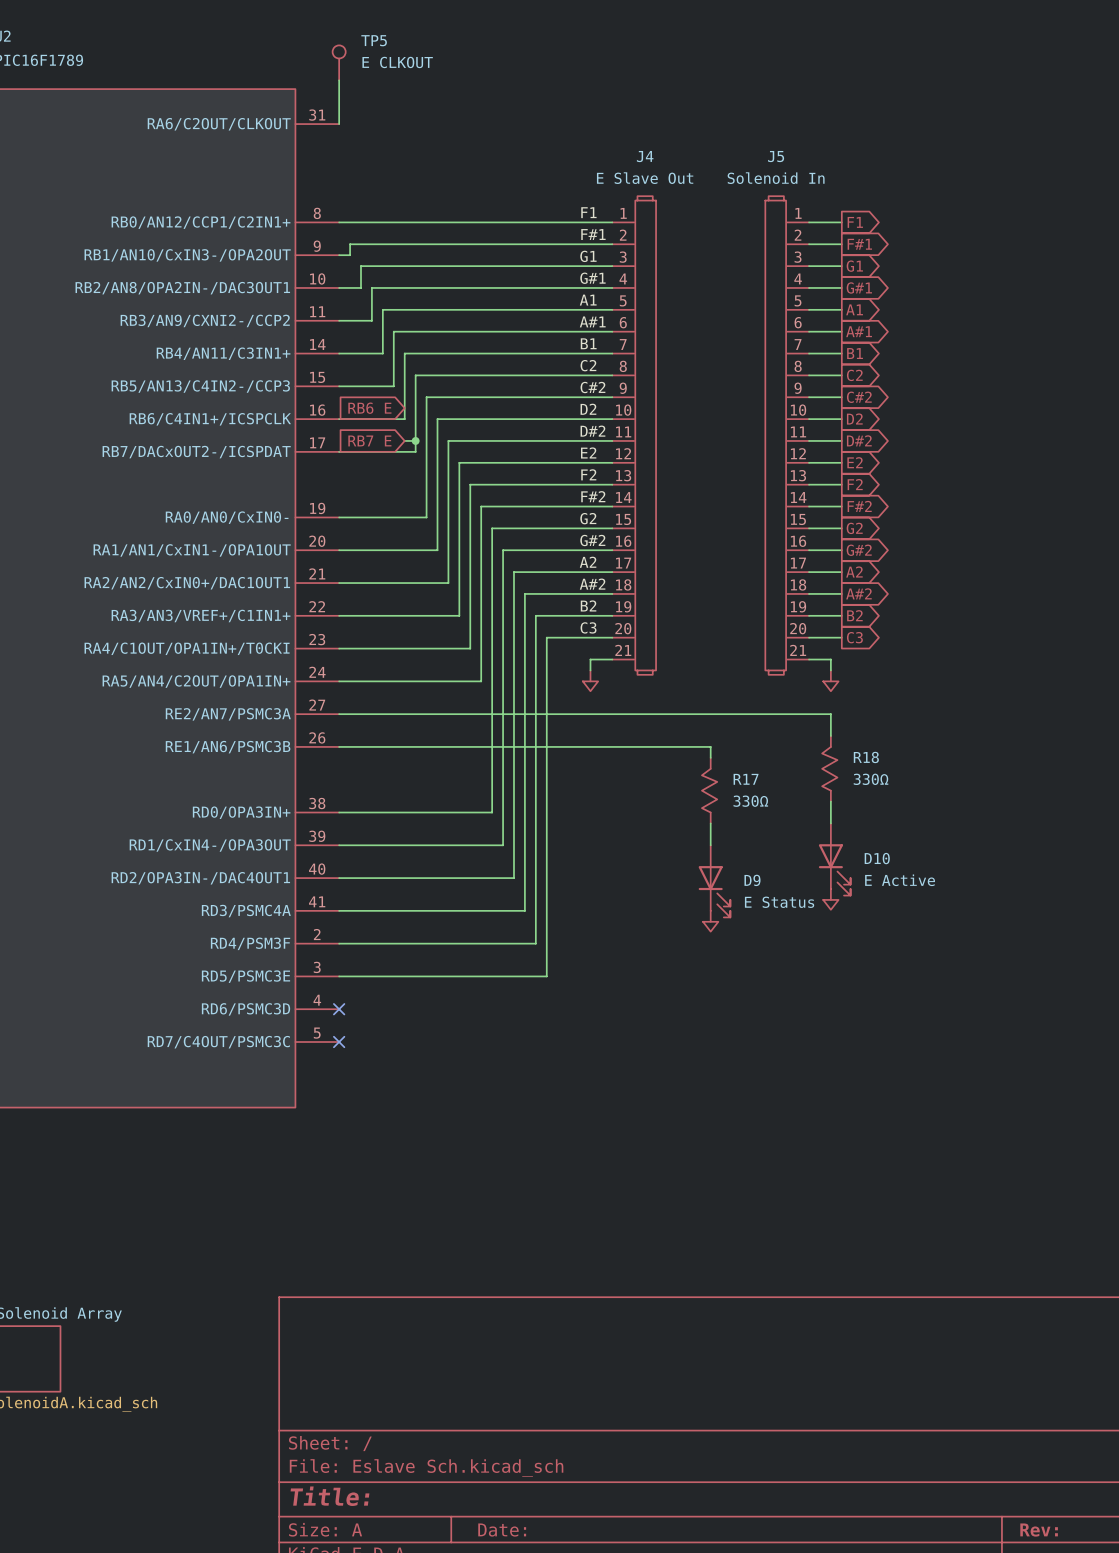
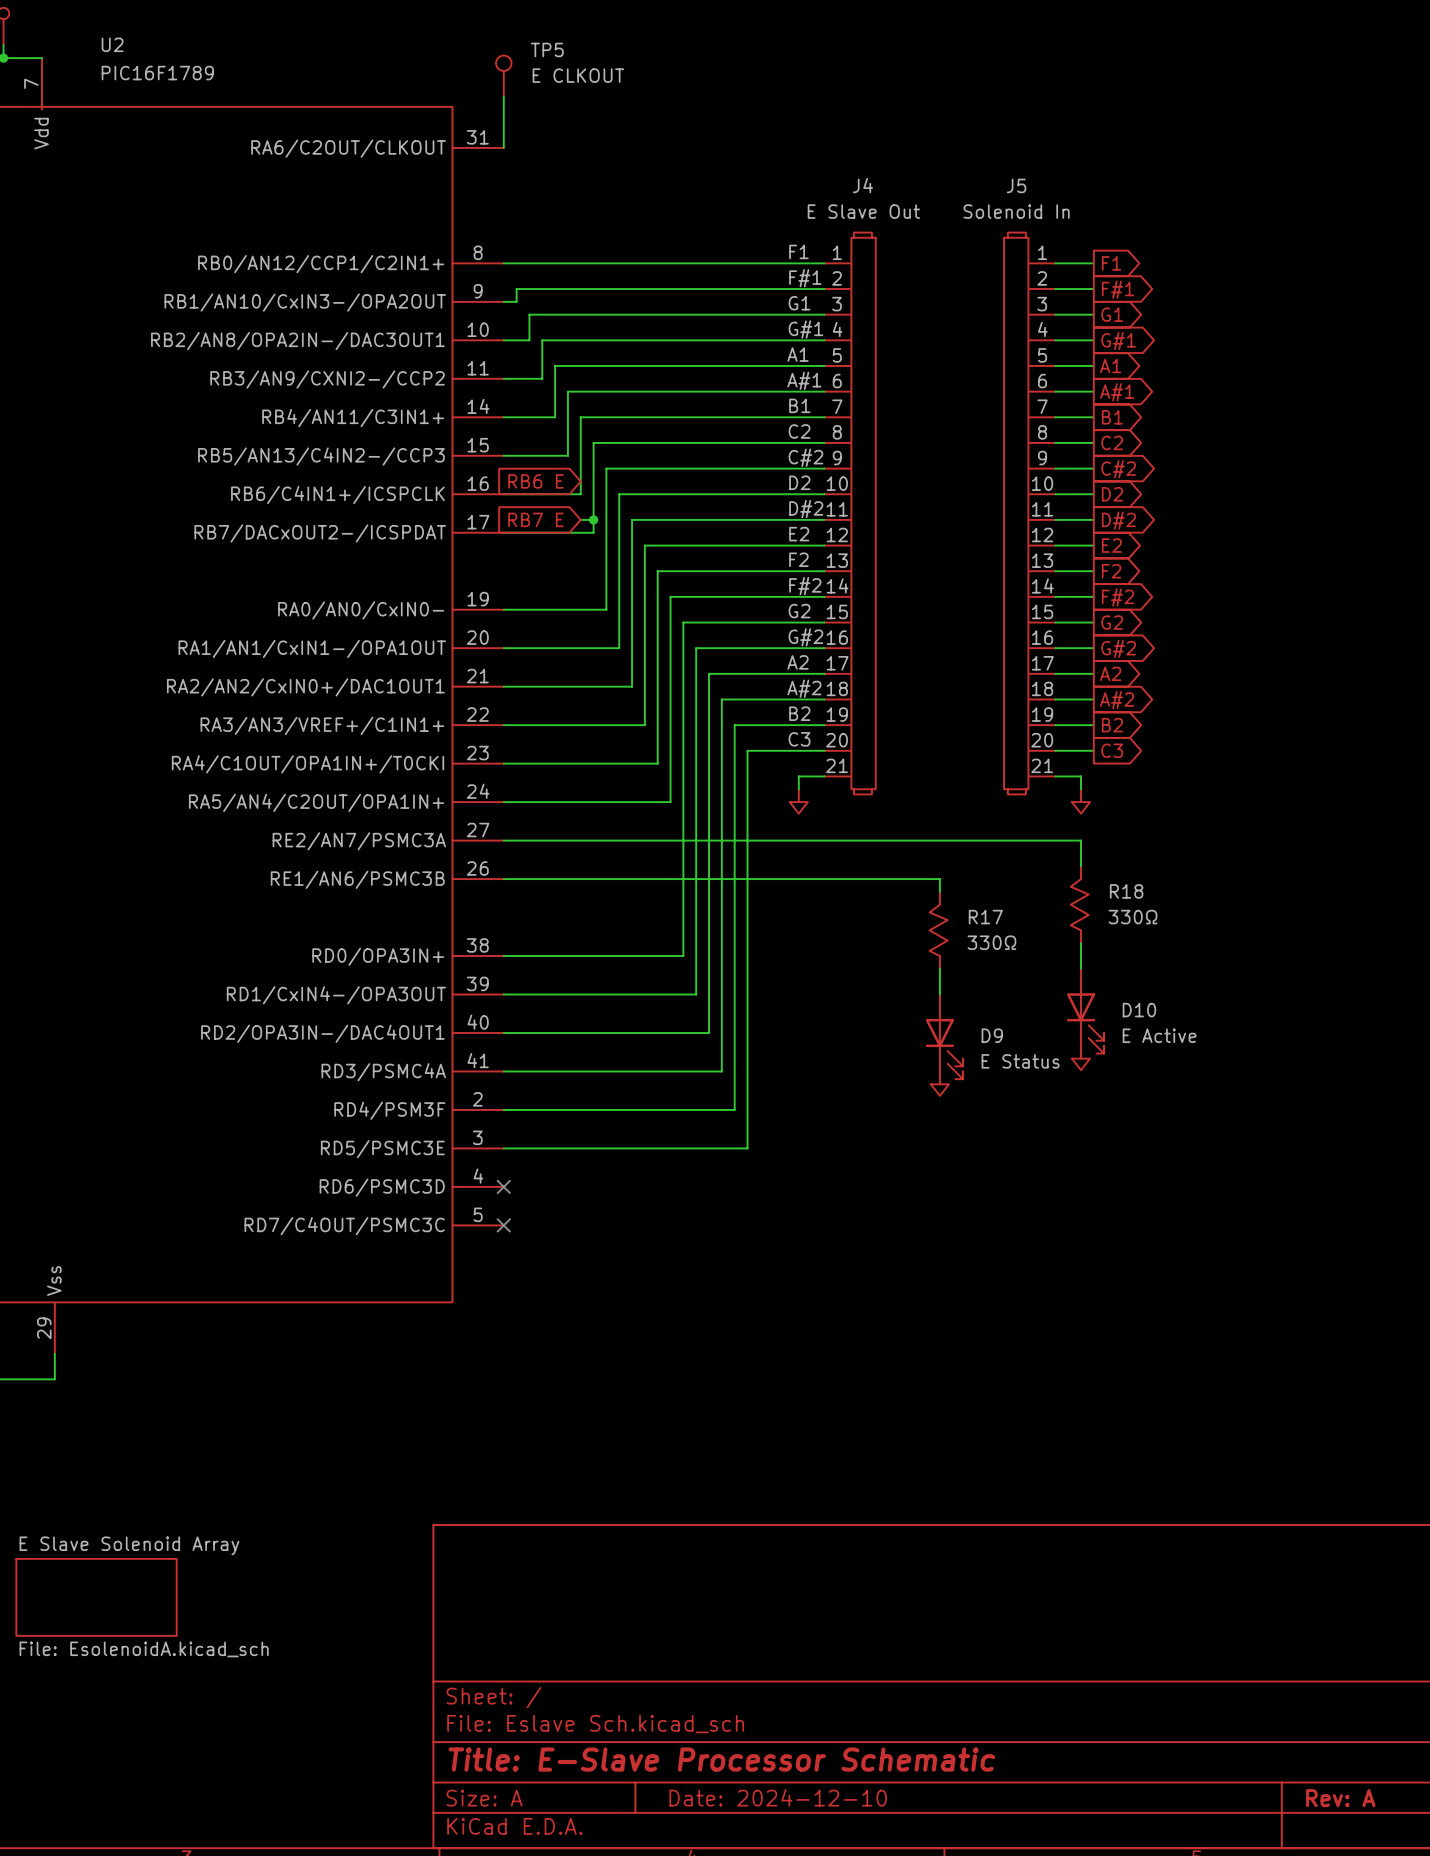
title block: Title: (329, 1496) -> Title: E-Slave Processor Schematic (721, 1759)
title block: Date: (502, 1530) -> Date: 2024-12-10 (778, 1797)
title block: Rev: (1039, 1530) -> Rev: A (1340, 1798)

